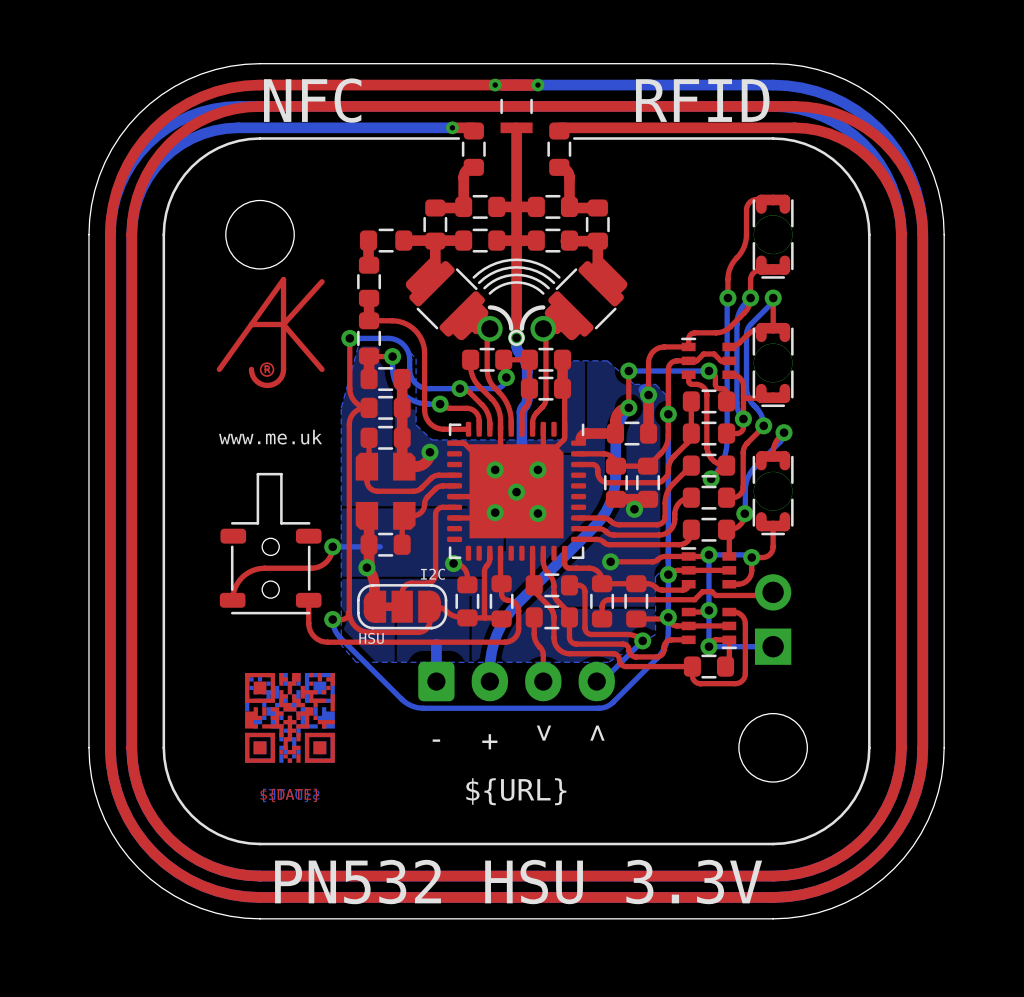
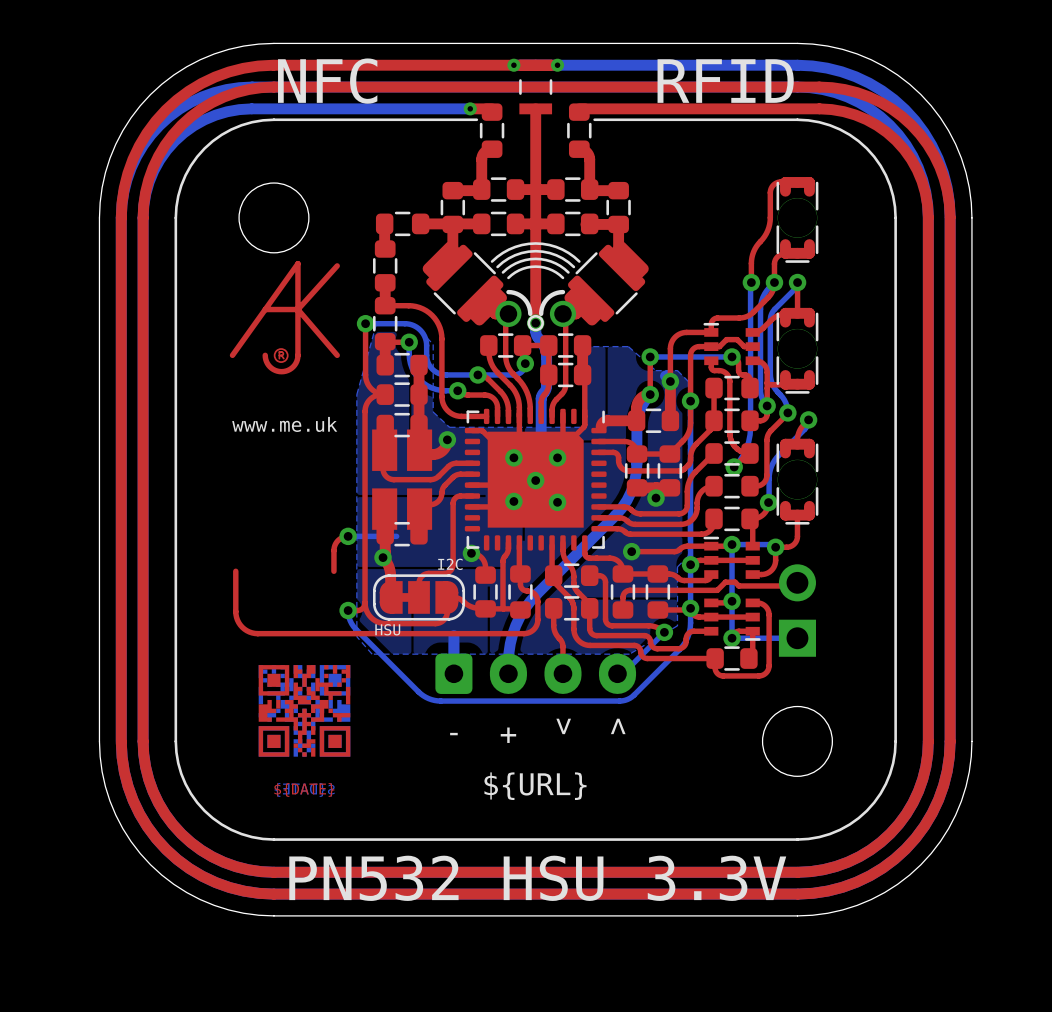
part footprint: [355, 452, 416, 530] -> [372, 429, 433, 530]
part: (270, 543) -> none
top track: (332, 546) (328, 560) (318, 567) (260, 568) (248, 572) (236, 584) (232, 600) -> (348, 536) (341, 538) (335, 545) (333, 571)
top track: (308, 600) (310, 630) (318, 639) (327, 642) -> (235, 571) (235, 614) (238, 622) (246, 630) (257, 633) (342, 633)

